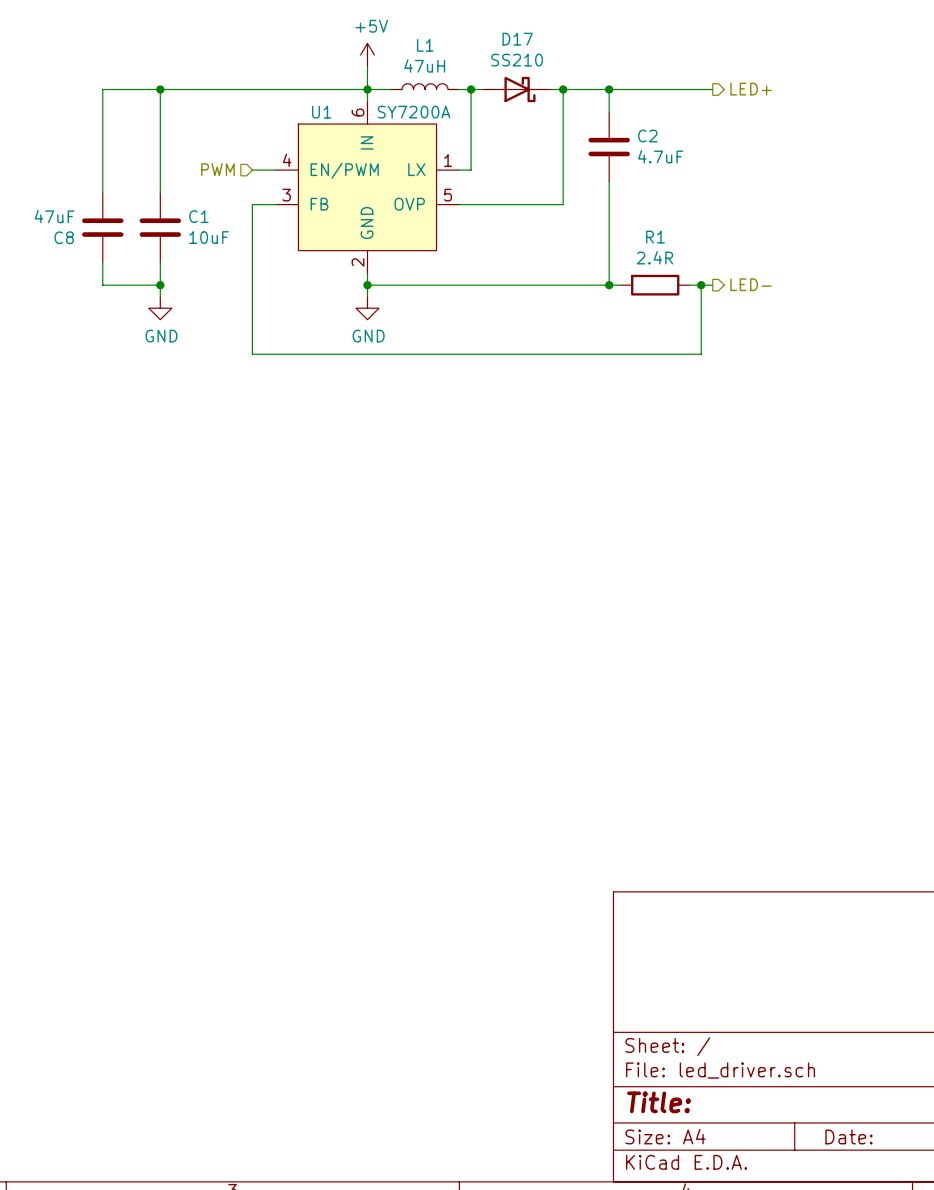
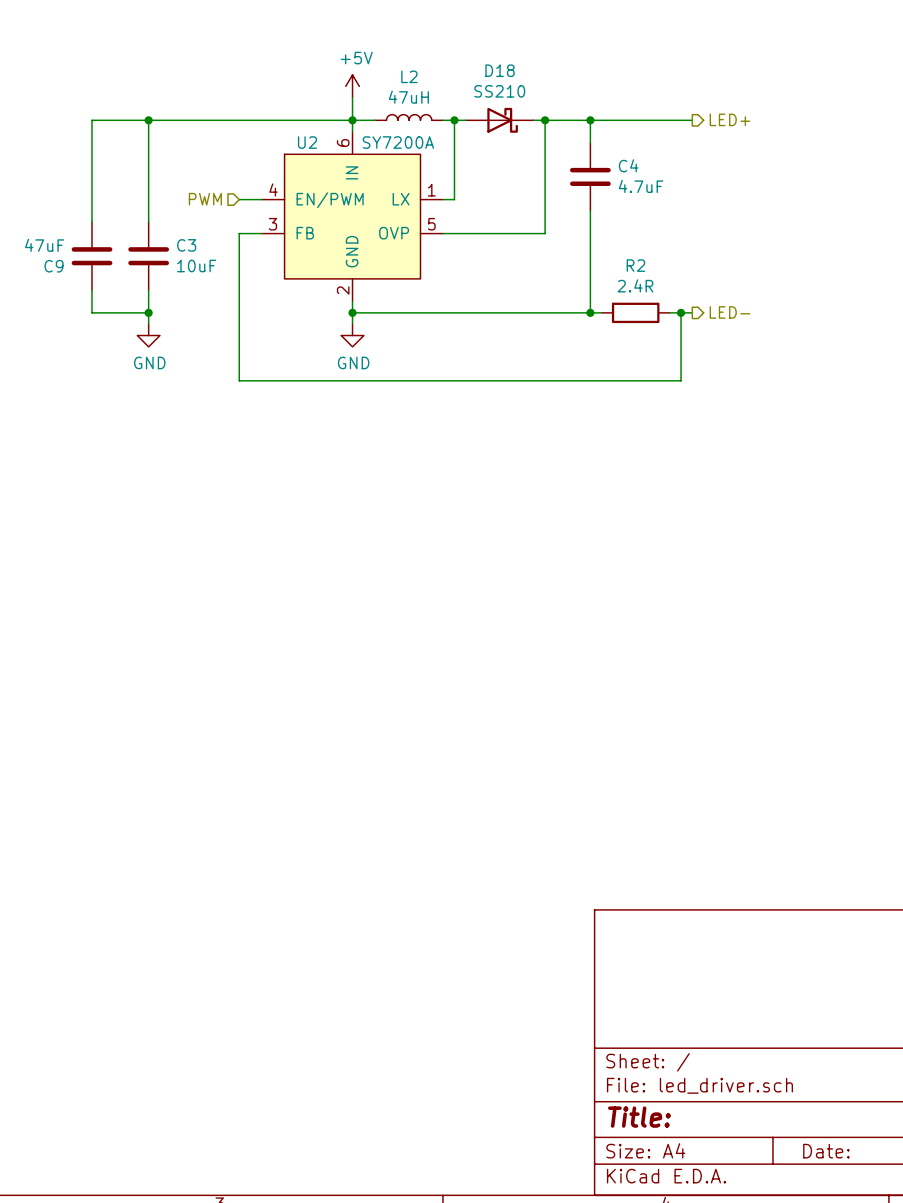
D17 name: D17 (517, 39) -> D18 (500, 70)
L1 name: L1 (425, 45) -> L2 (409, 76)
U1 name: U1 (321, 112) -> U2 (307, 142)
C2 name: C2 (647, 136) -> C4 (628, 165)
C1 name: C1 (198, 216) -> C3 (186, 245)
C8 name: C8 (64, 237) -> C9 (54, 266)
R1 name: R1 (655, 237) -> R2 (635, 265)

